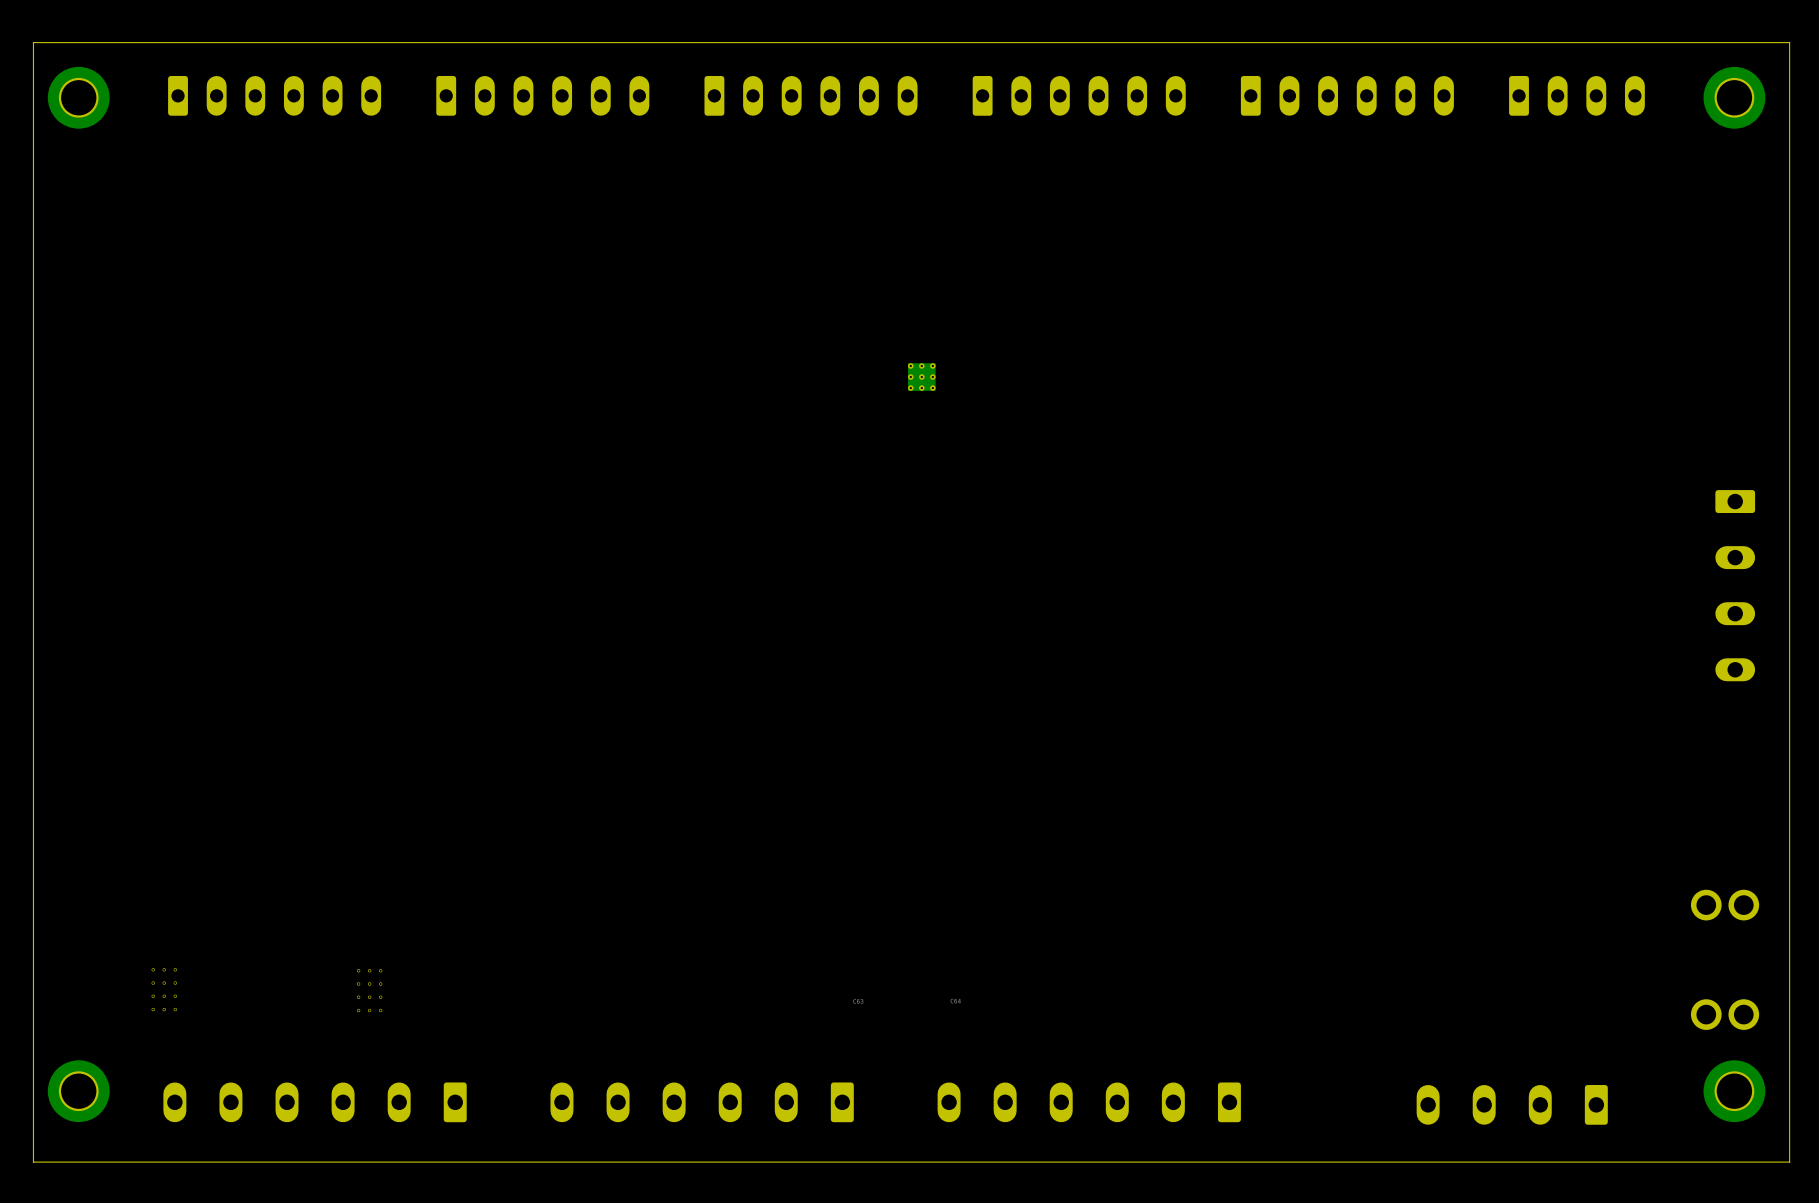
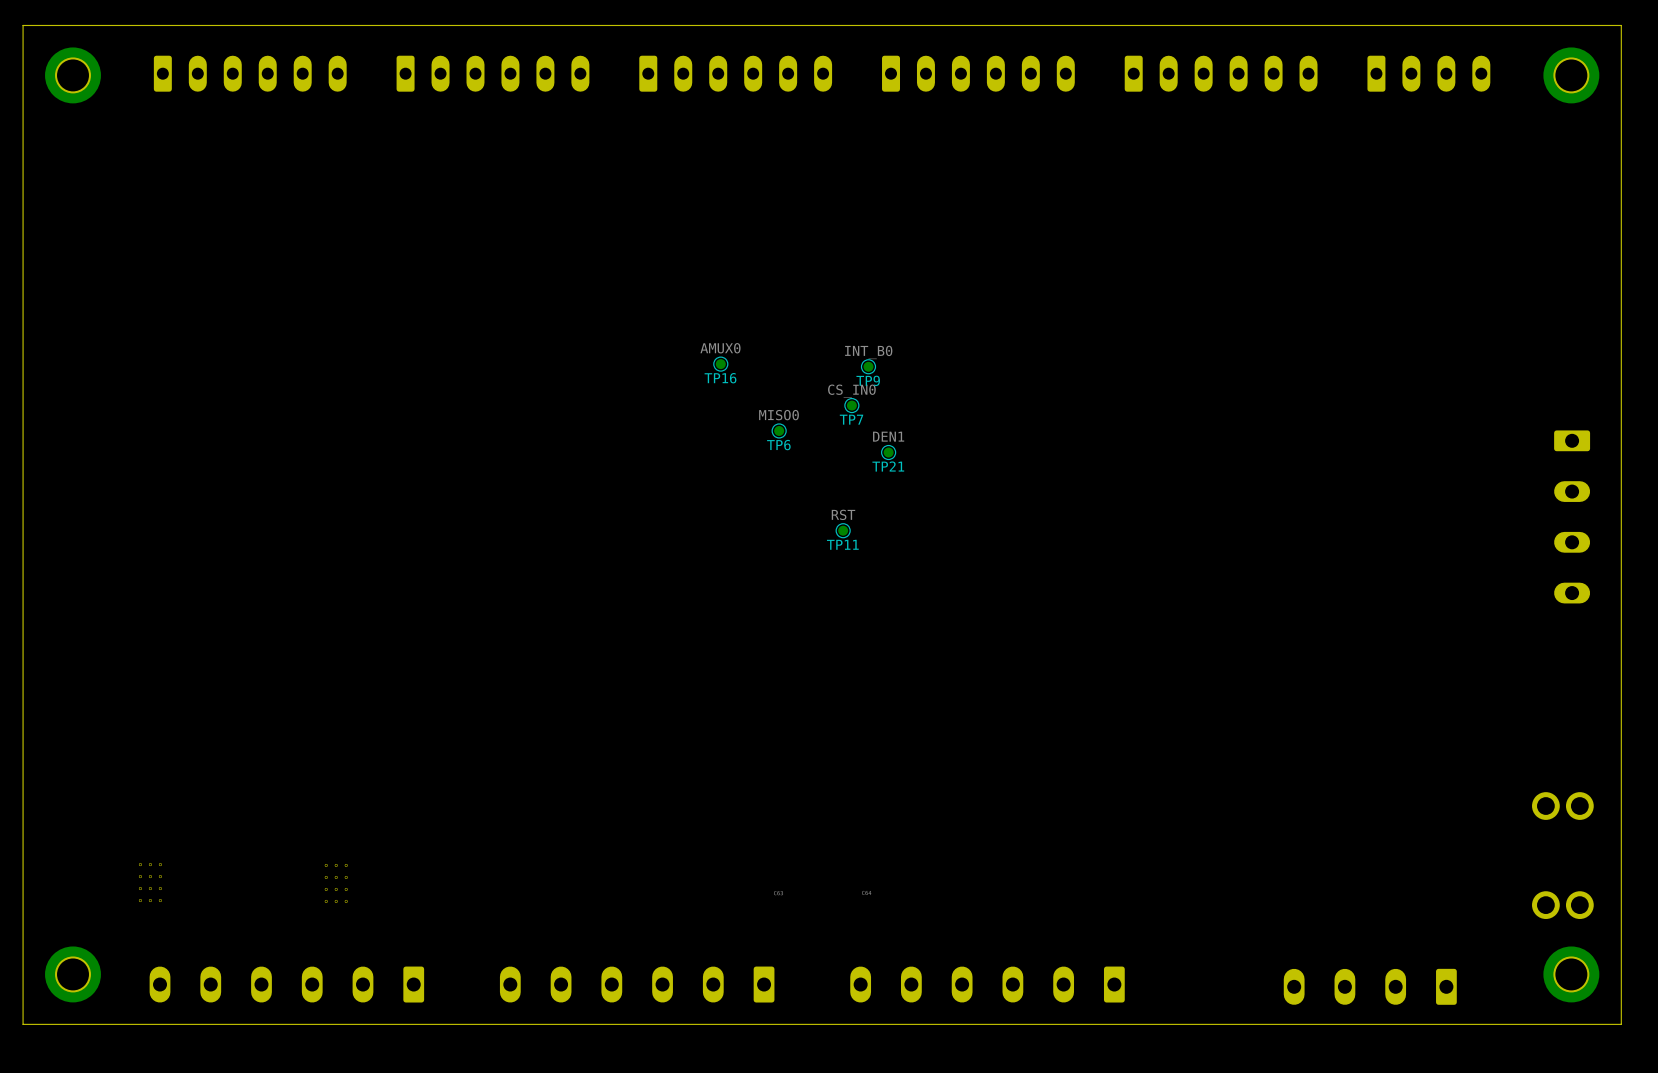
board edge: (33, 42) (33, 1162) (1789, 1162) (1789, 1146) -> (32, 25) (23, 25) (23, 1024) (1621, 1024)
part: (921, 377) -> none
TP16: none -> AMUX0 (720, 364)
TP9: none -> INT_B0 (868, 366)
TP7: none -> CS_IN0 (851, 405)
TP6: none -> MISO0 (779, 430)
TP21: none -> DEN1 (888, 452)
TP11: none -> RST (843, 530)

